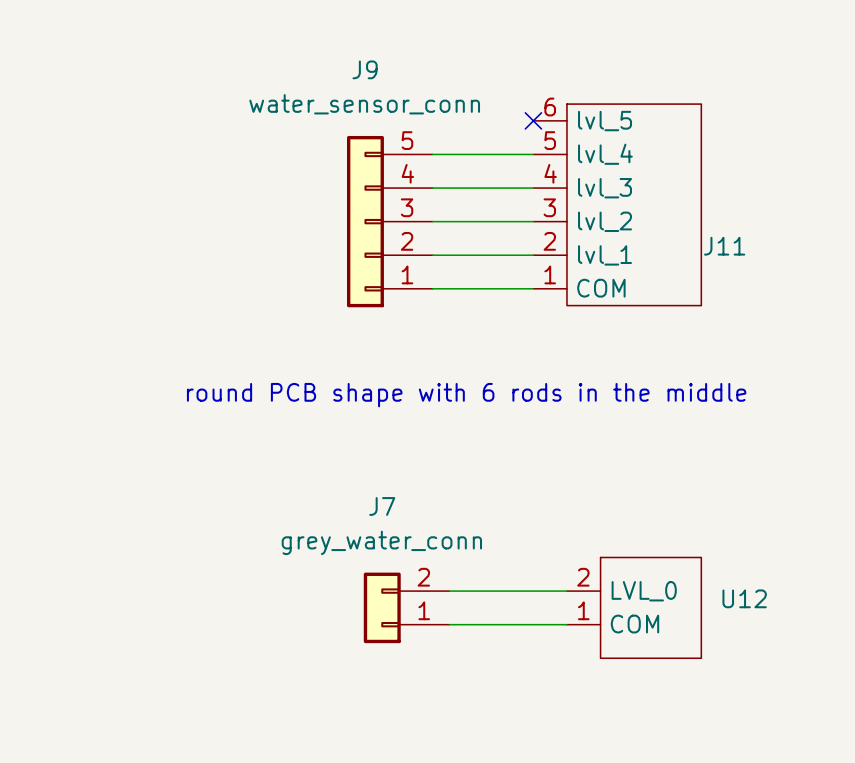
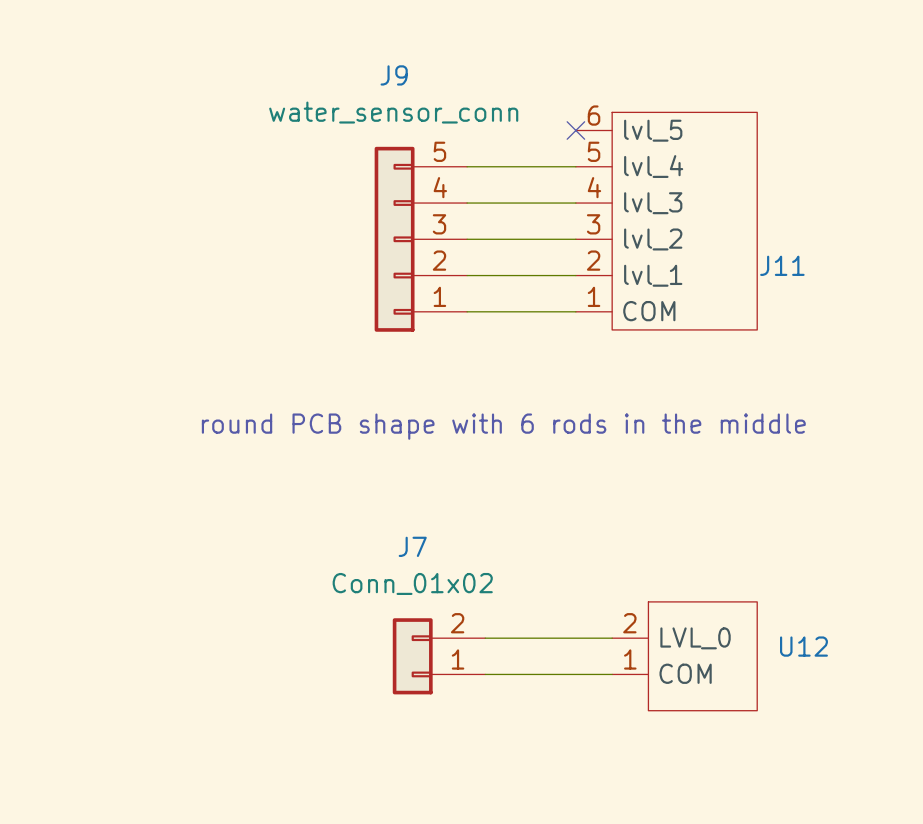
J7 value: grey_water_conn (381, 542) -> Conn_01x02 (412, 583)

